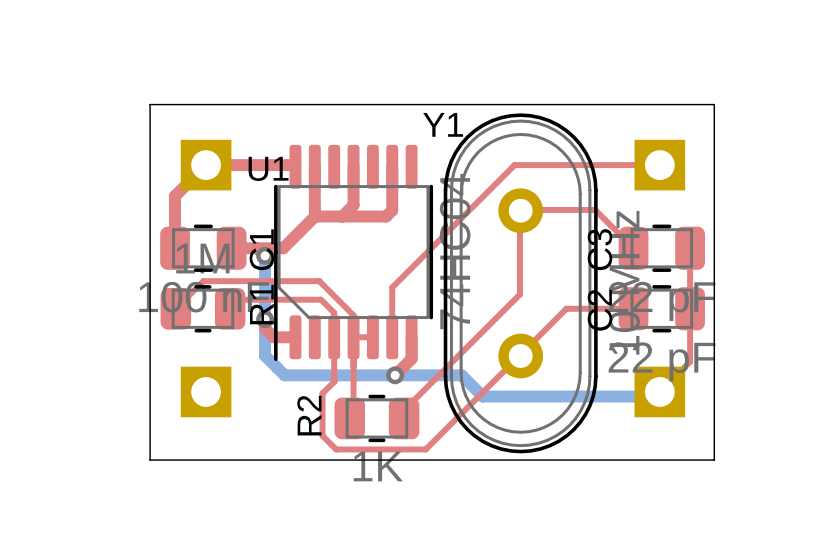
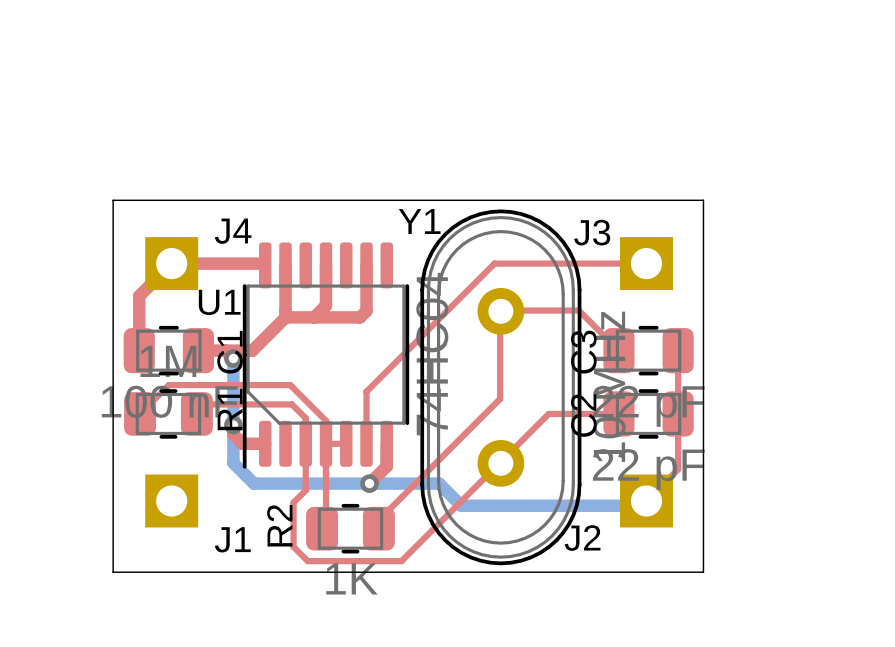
J4 name: none -> J4 (233, 231)
J3 name: none -> J3 (592, 232)
U1 name position: U1 (268, 168) -> U1 (219, 302)
J2 name: none -> J2 (582, 538)
J1 name: none -> J1 (232, 539)

